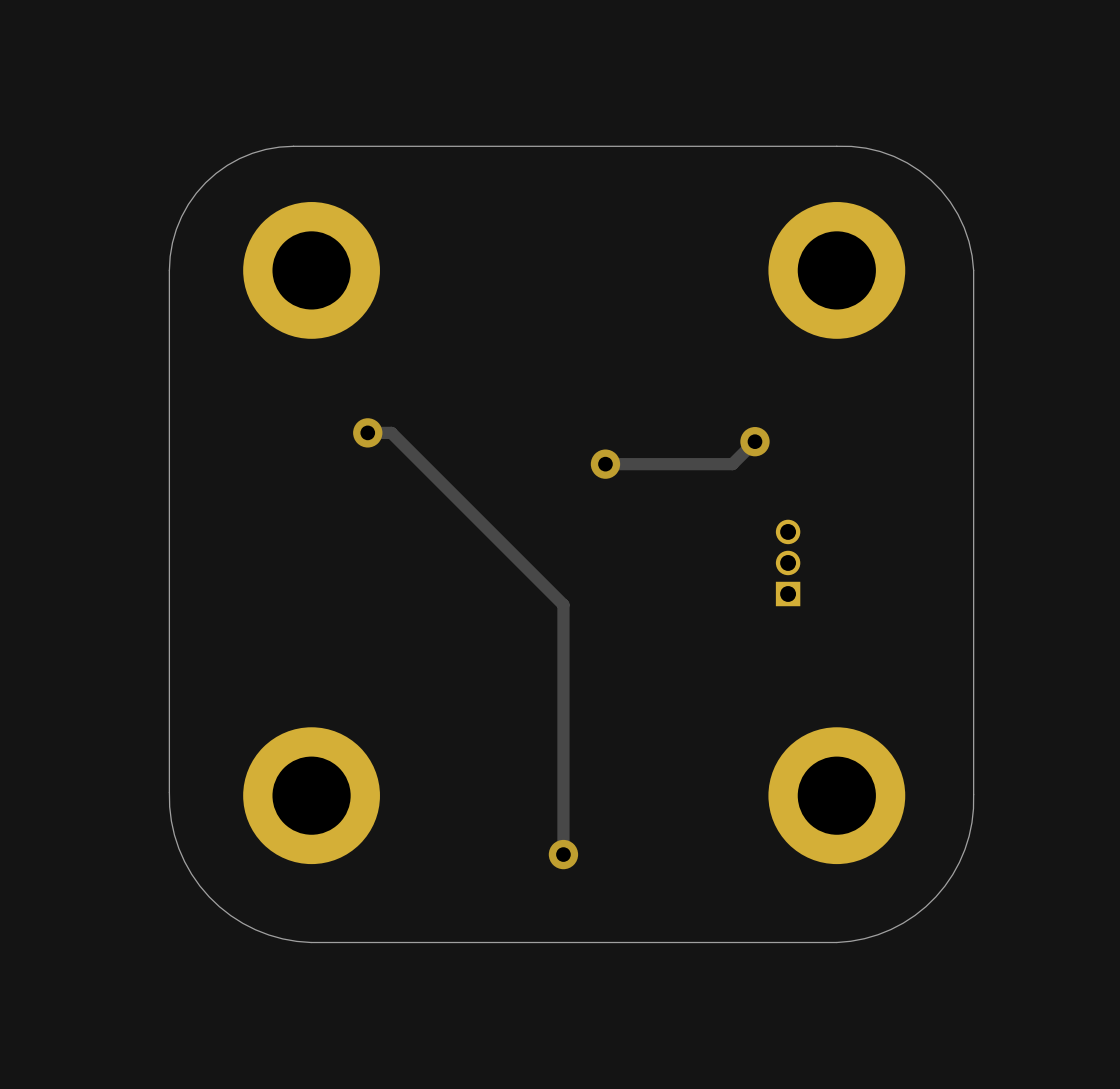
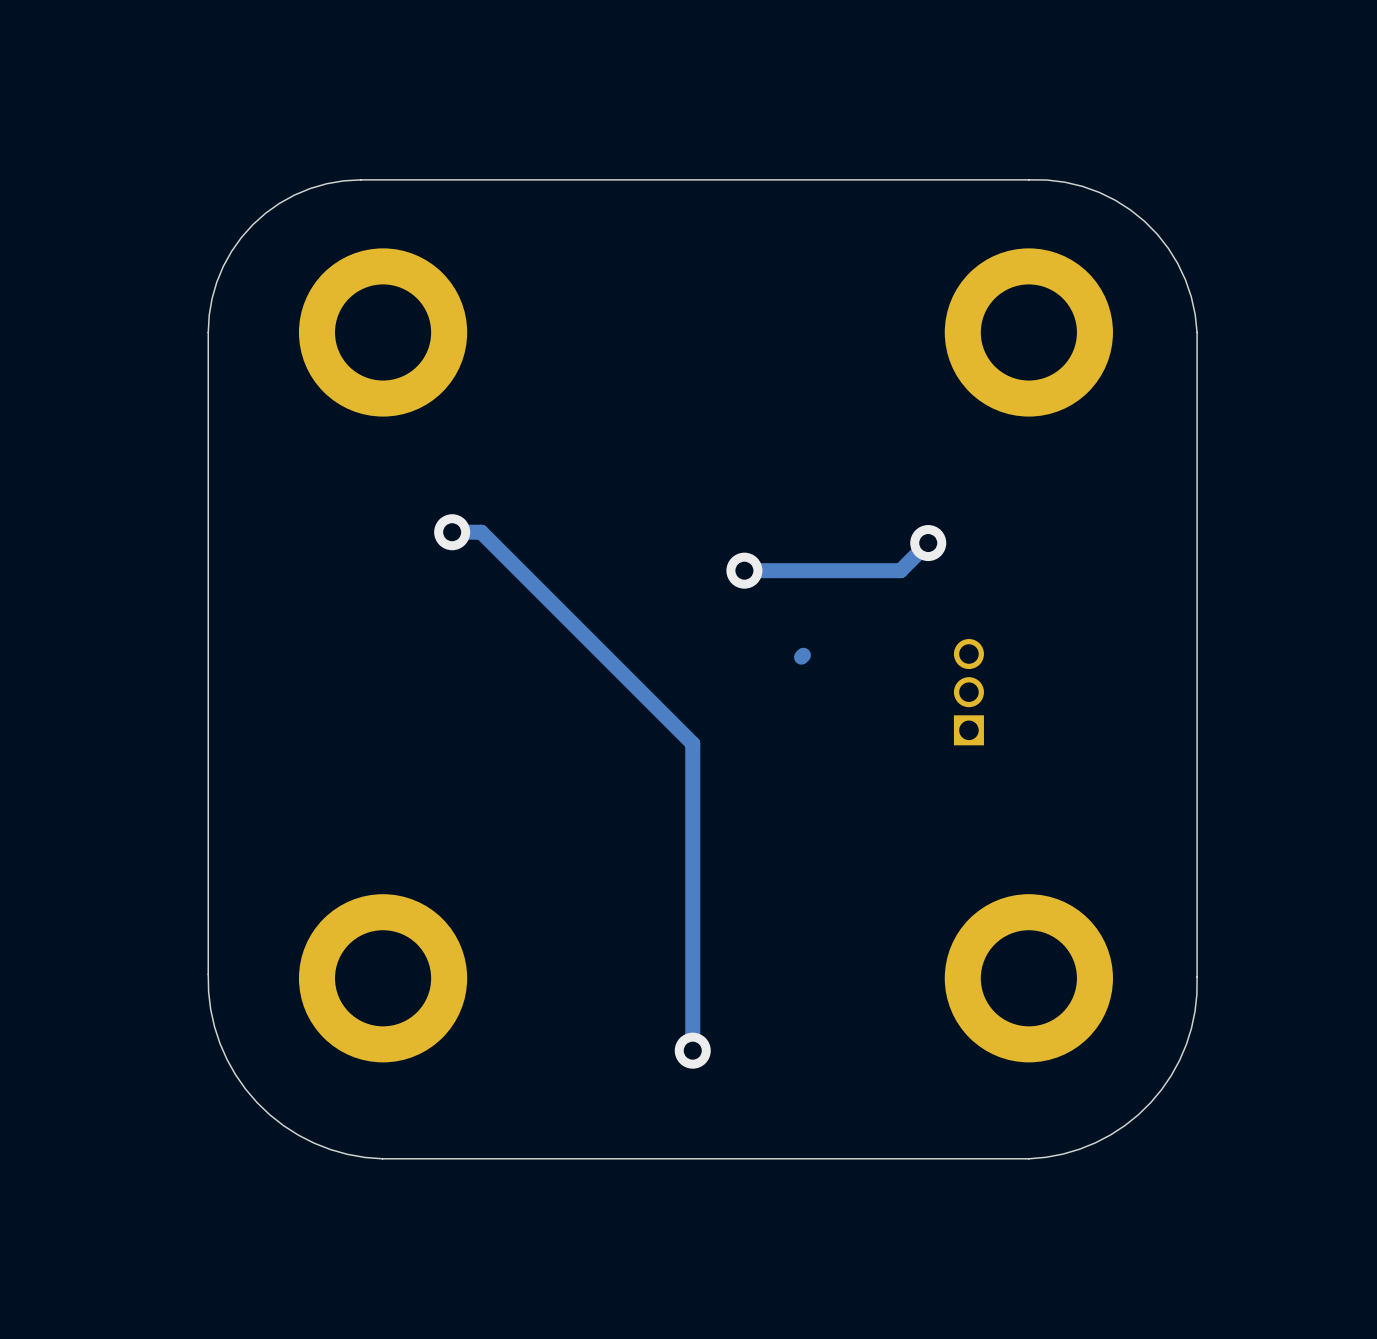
track: none -> (803, 655) (801, 657)

